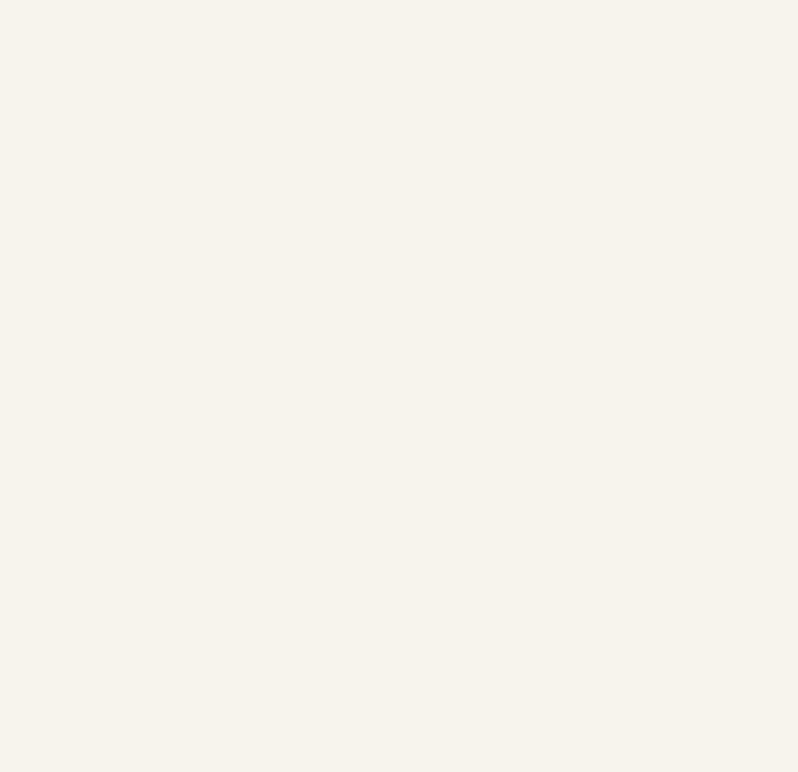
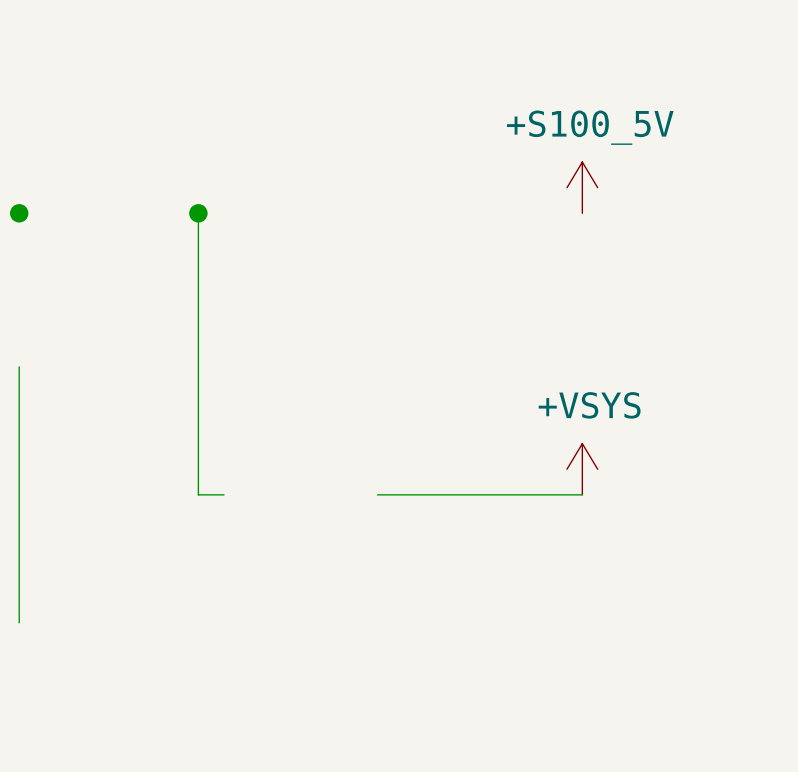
power symbol: none -> +S100_5V (582, 187)
junction: none -> (19, 213)
wire: none -> (198, 213) (198, 494) (223, 494)
junction: none -> (198, 213)
wire: none -> (19, 366) (19, 622)
power symbol: none -> +VSYS (582, 469)
wire: none -> (377, 494) (582, 494)

